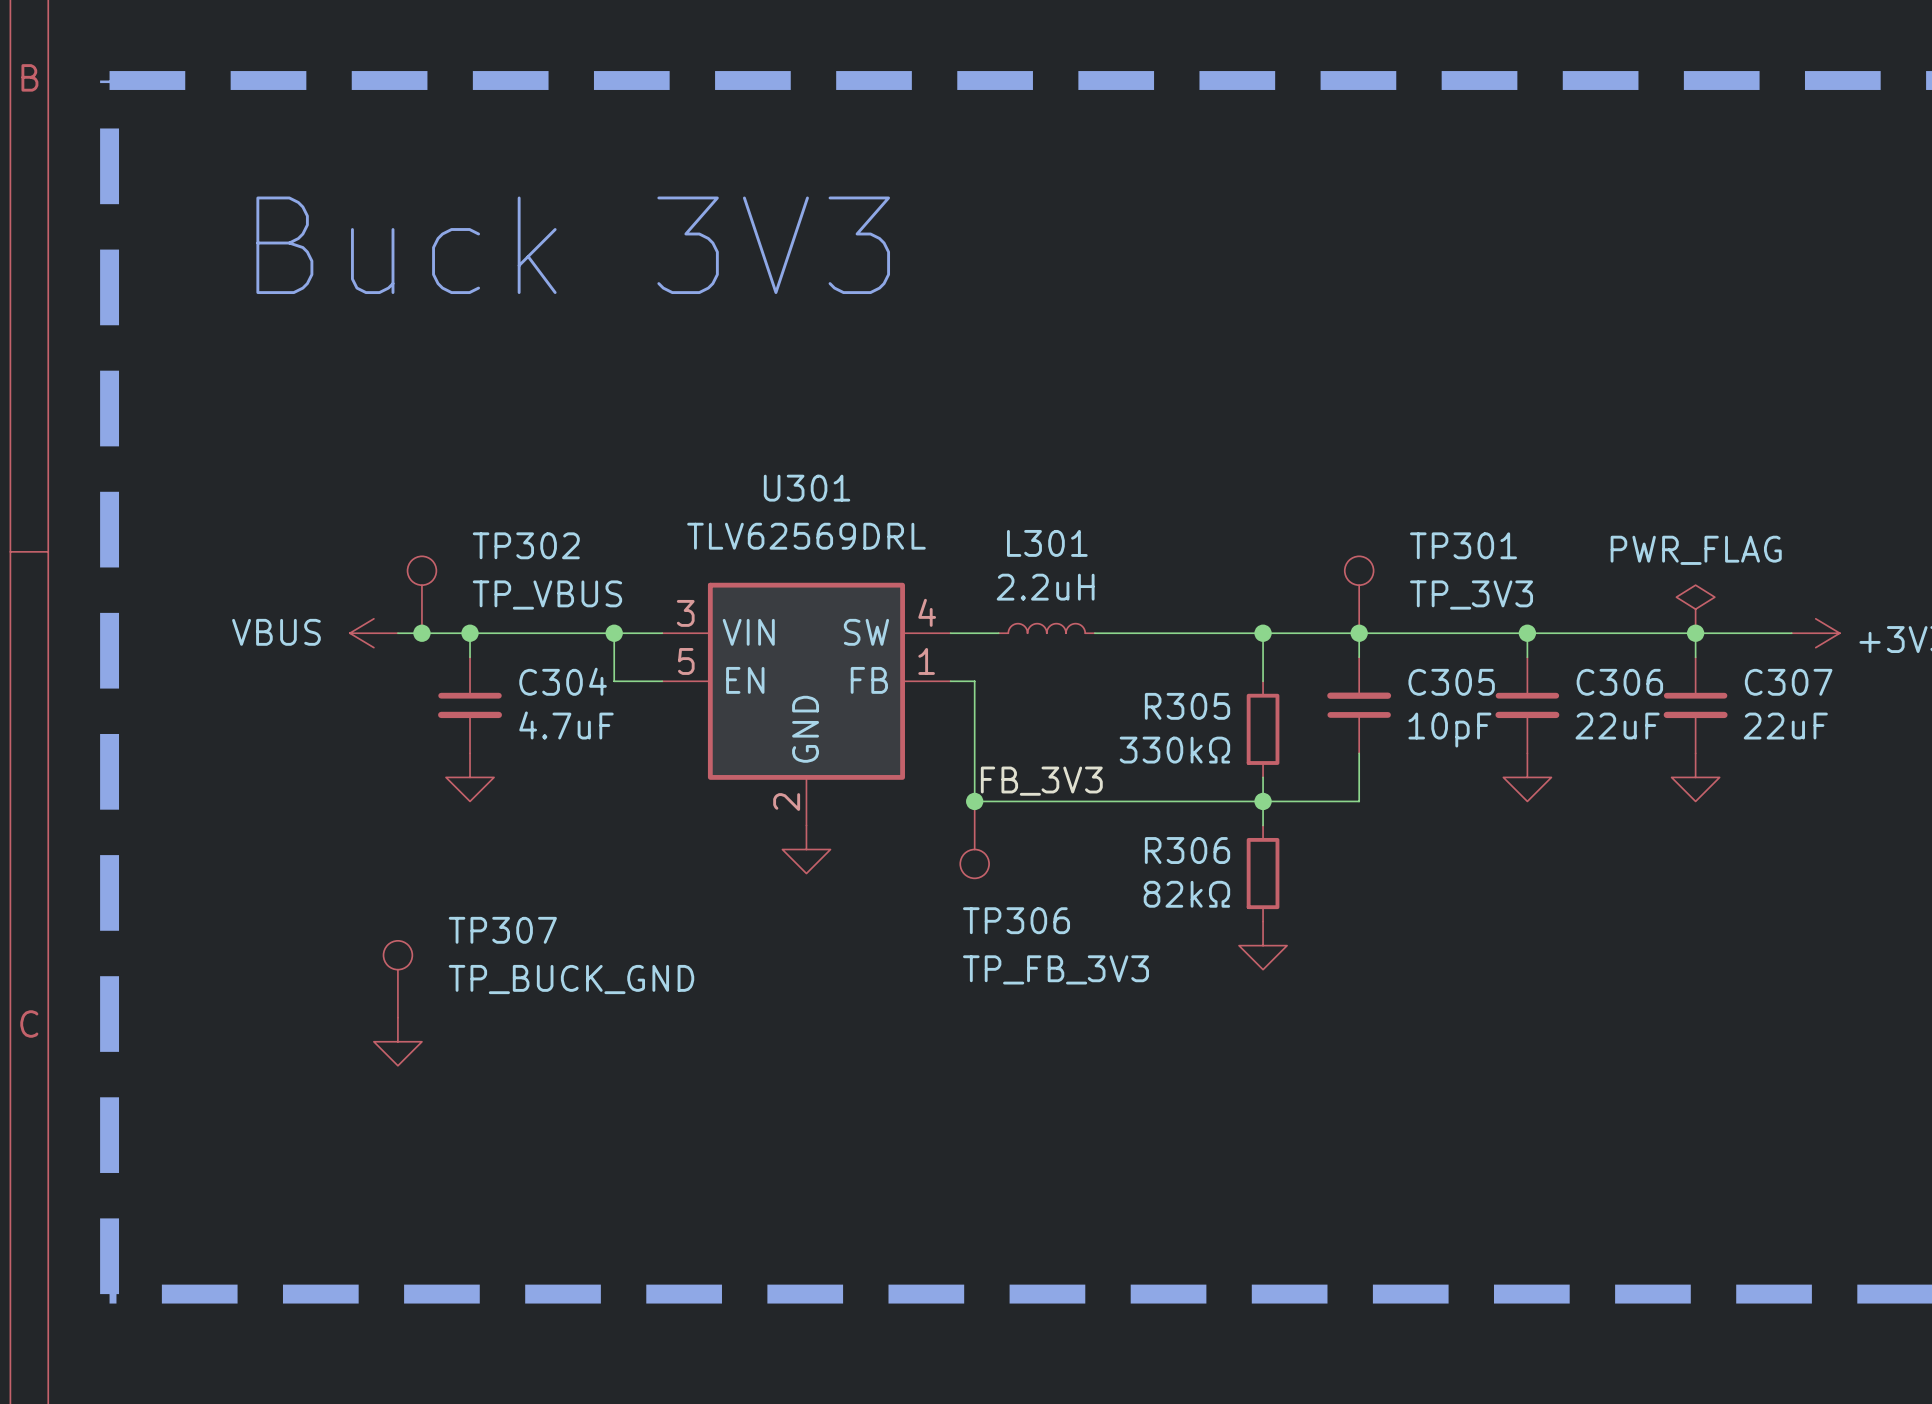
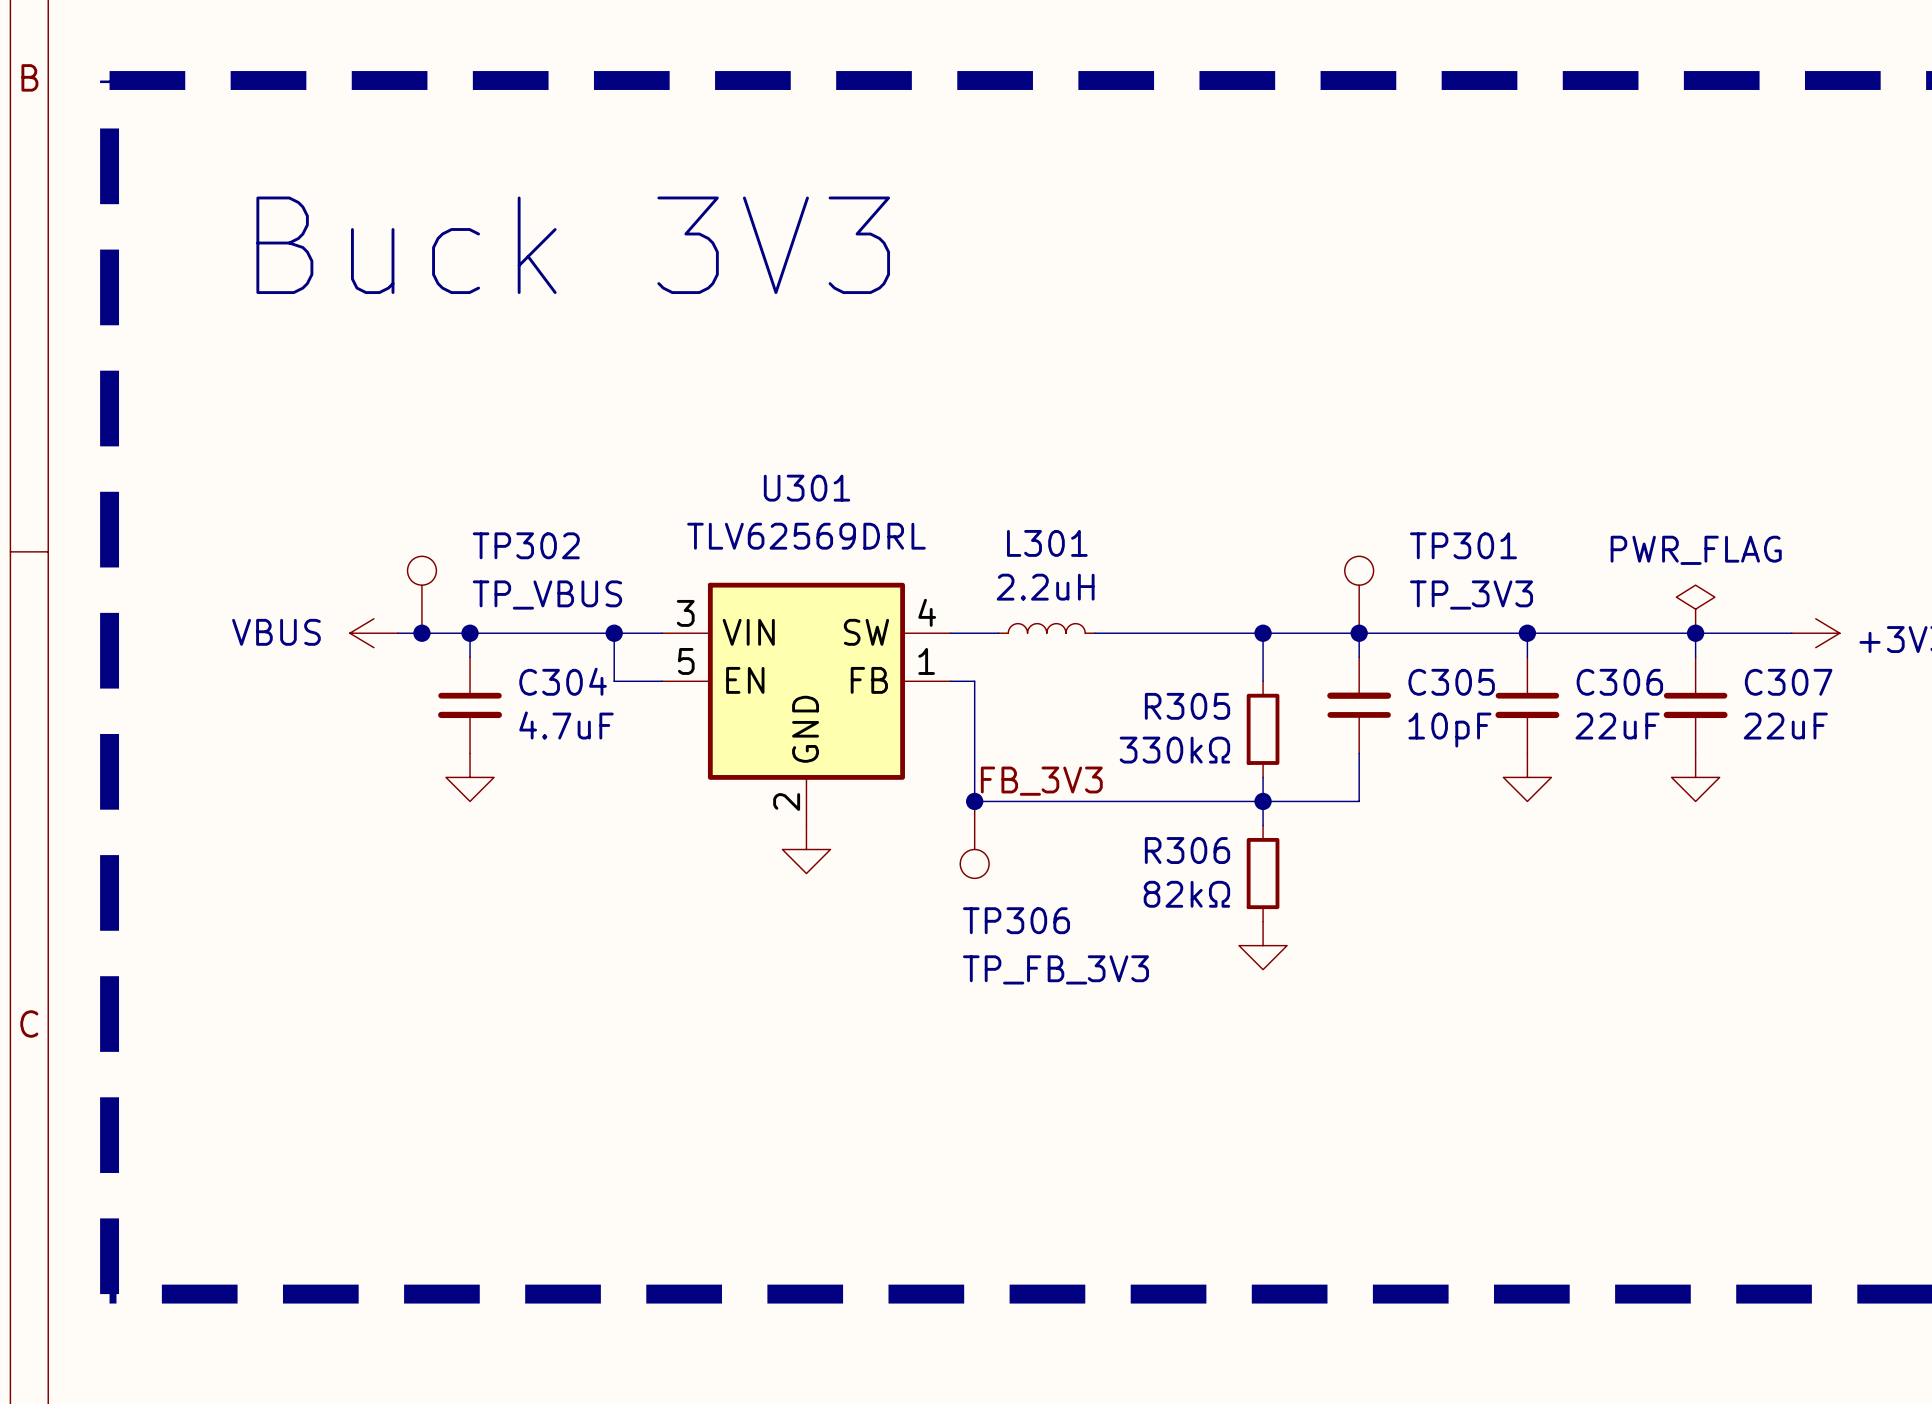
TP307: TP_BUCK_GND (397, 979) -> none
power symbol: (397, 1041) -> none

